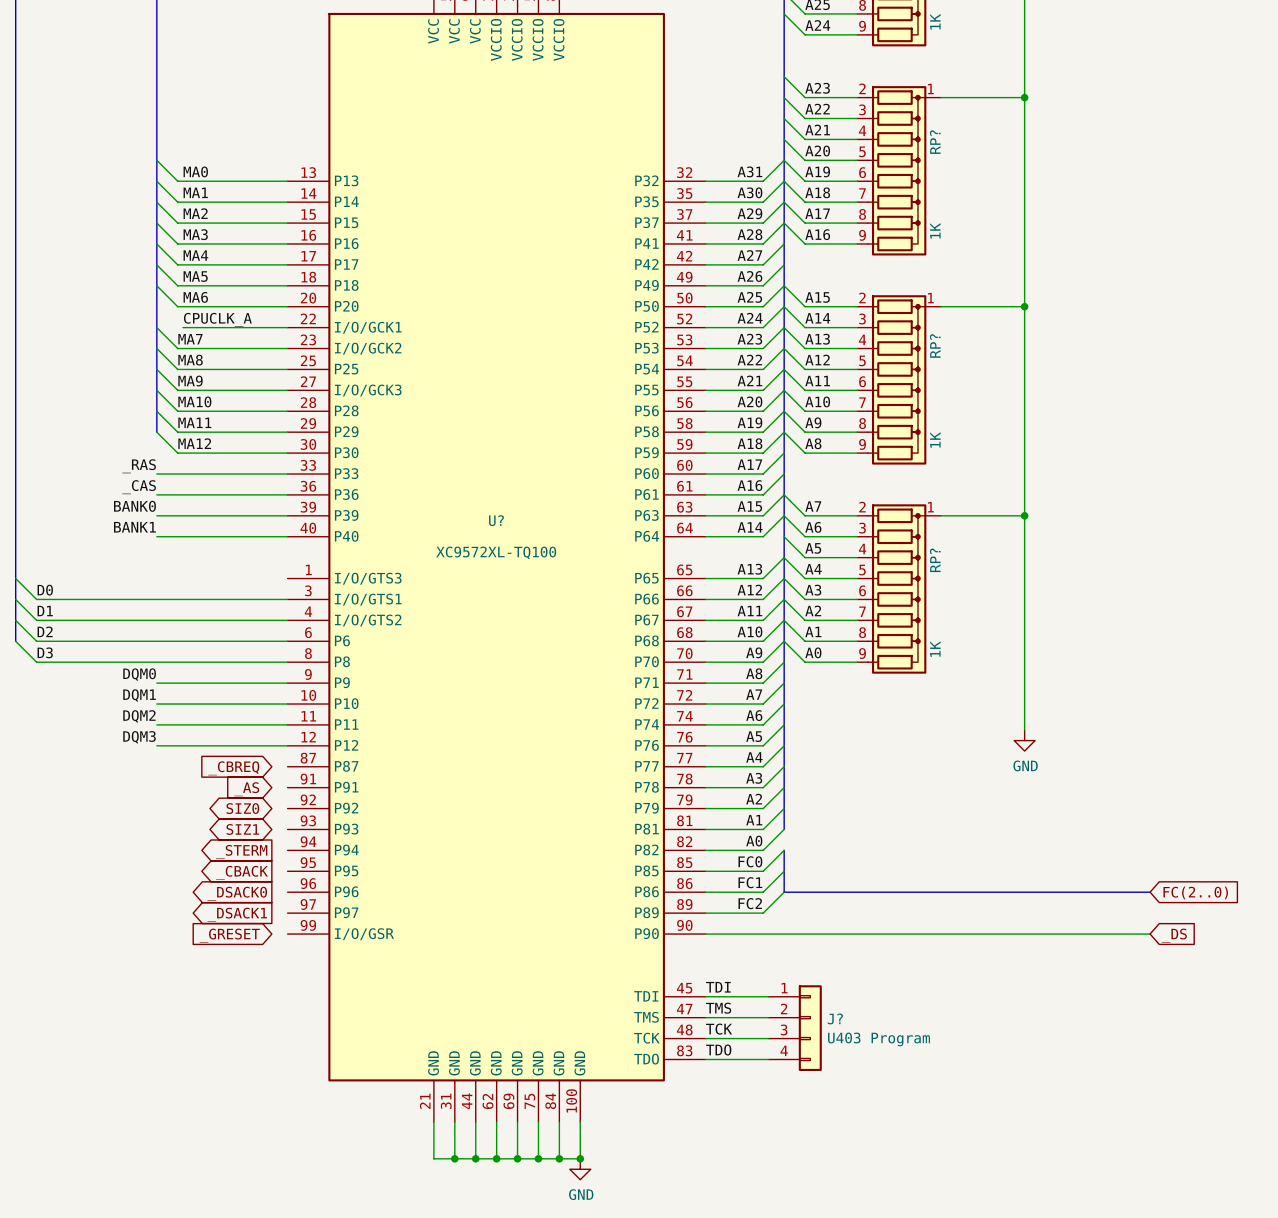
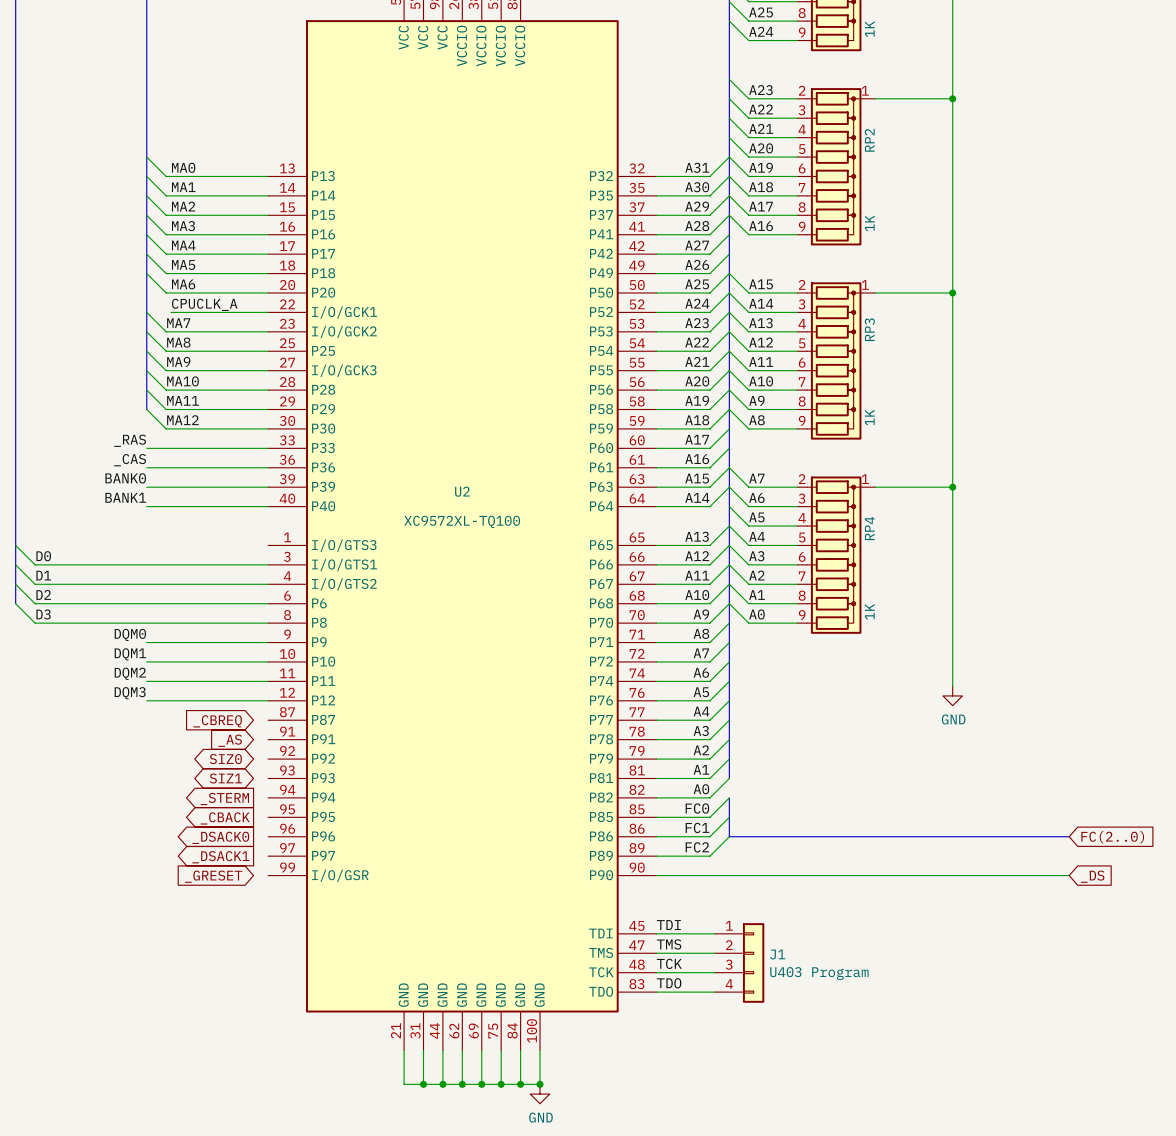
RP? name: RP? (935, 142) -> RP2 (869, 140)
RP? name: RP? (935, 345) -> RP3 (869, 329)
U? name: U? (496, 520) -> U2 (462, 491)
RP? name: RP? (935, 560) -> RP4 (869, 528)
J? name: J? (835, 1018) -> J1 (777, 954)

